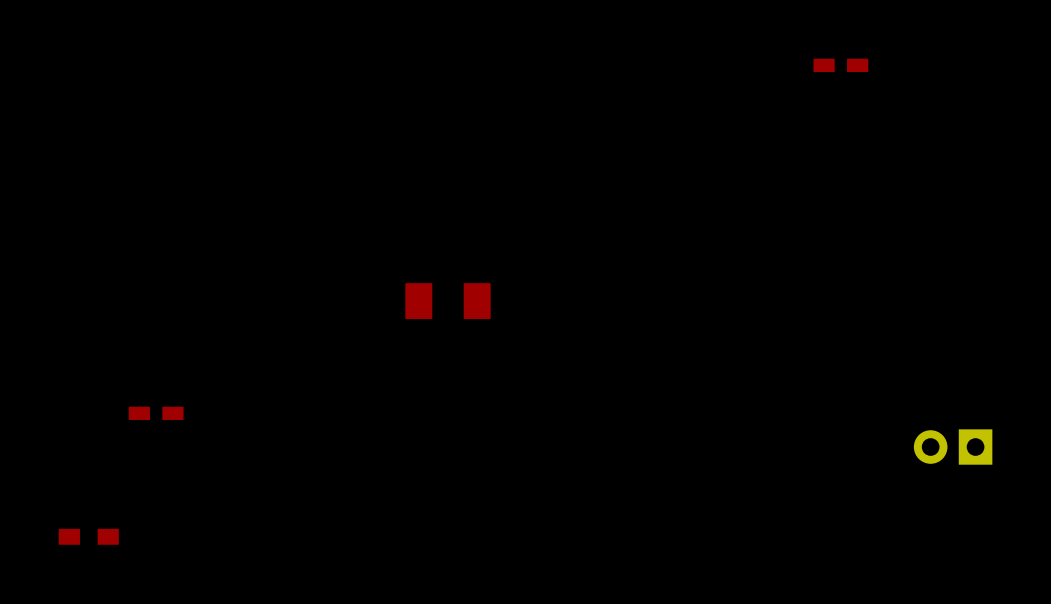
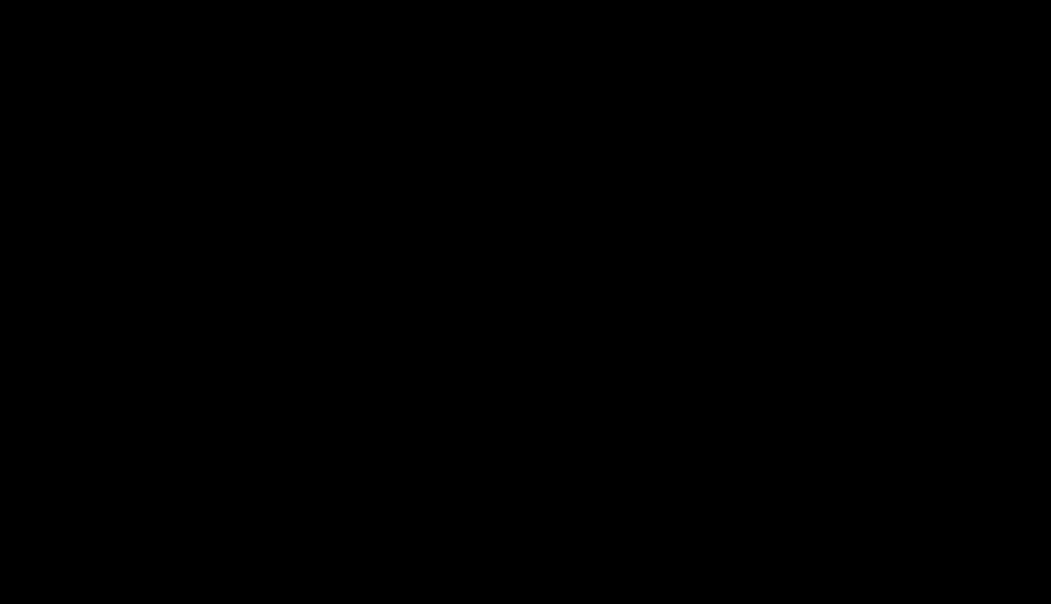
part: (840, 65) -> none
part: (447, 301) -> none
part: (156, 413) -> none
part: (953, 447) -> none
part: (88, 536) -> none

